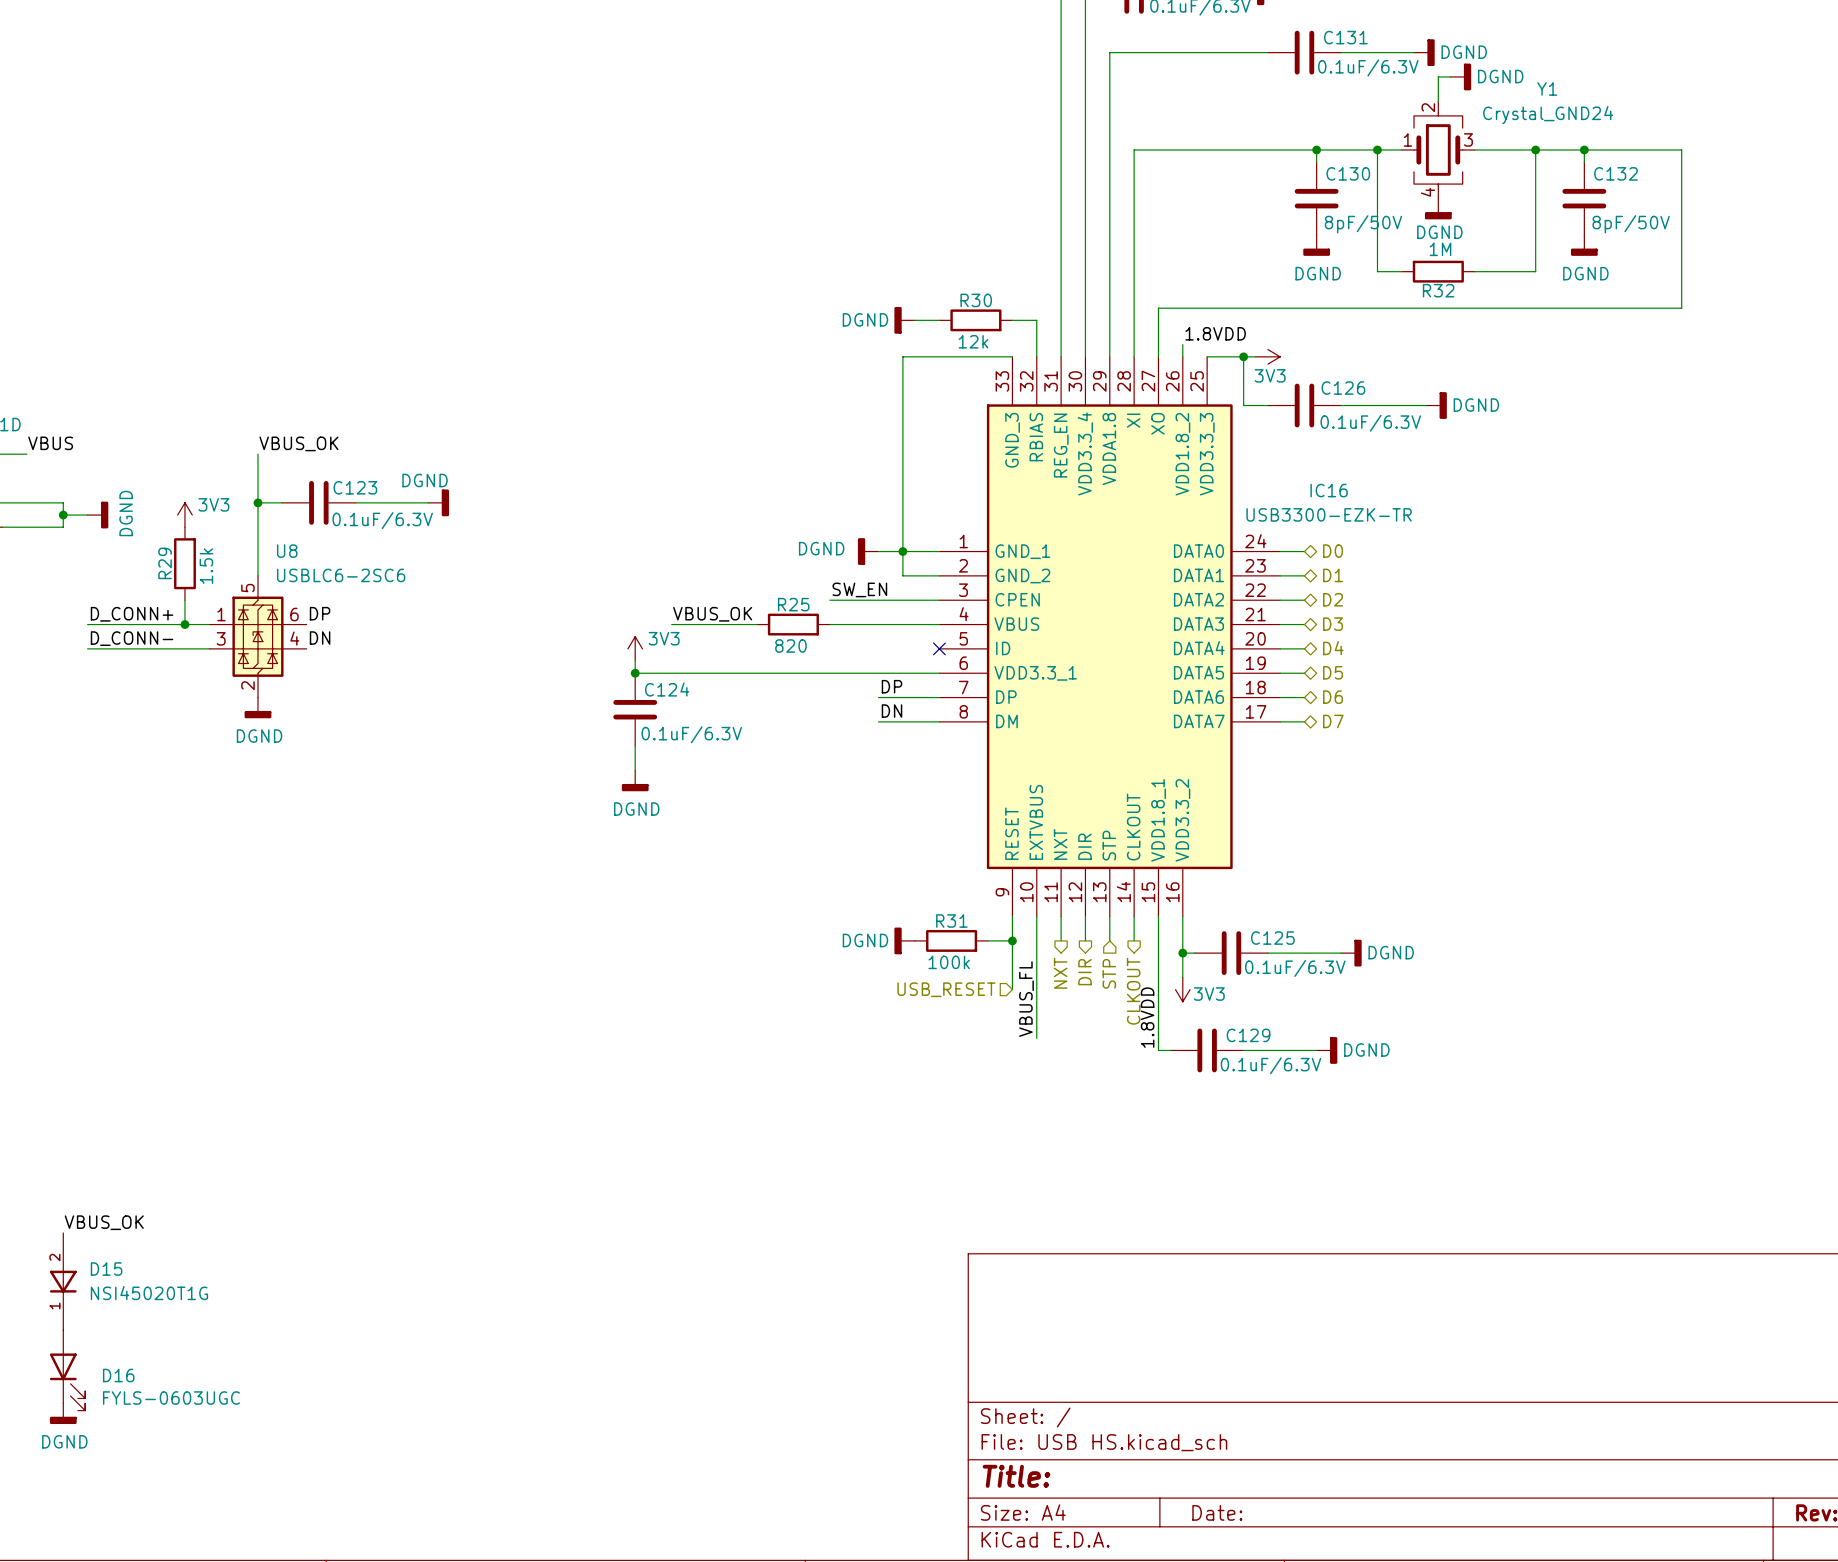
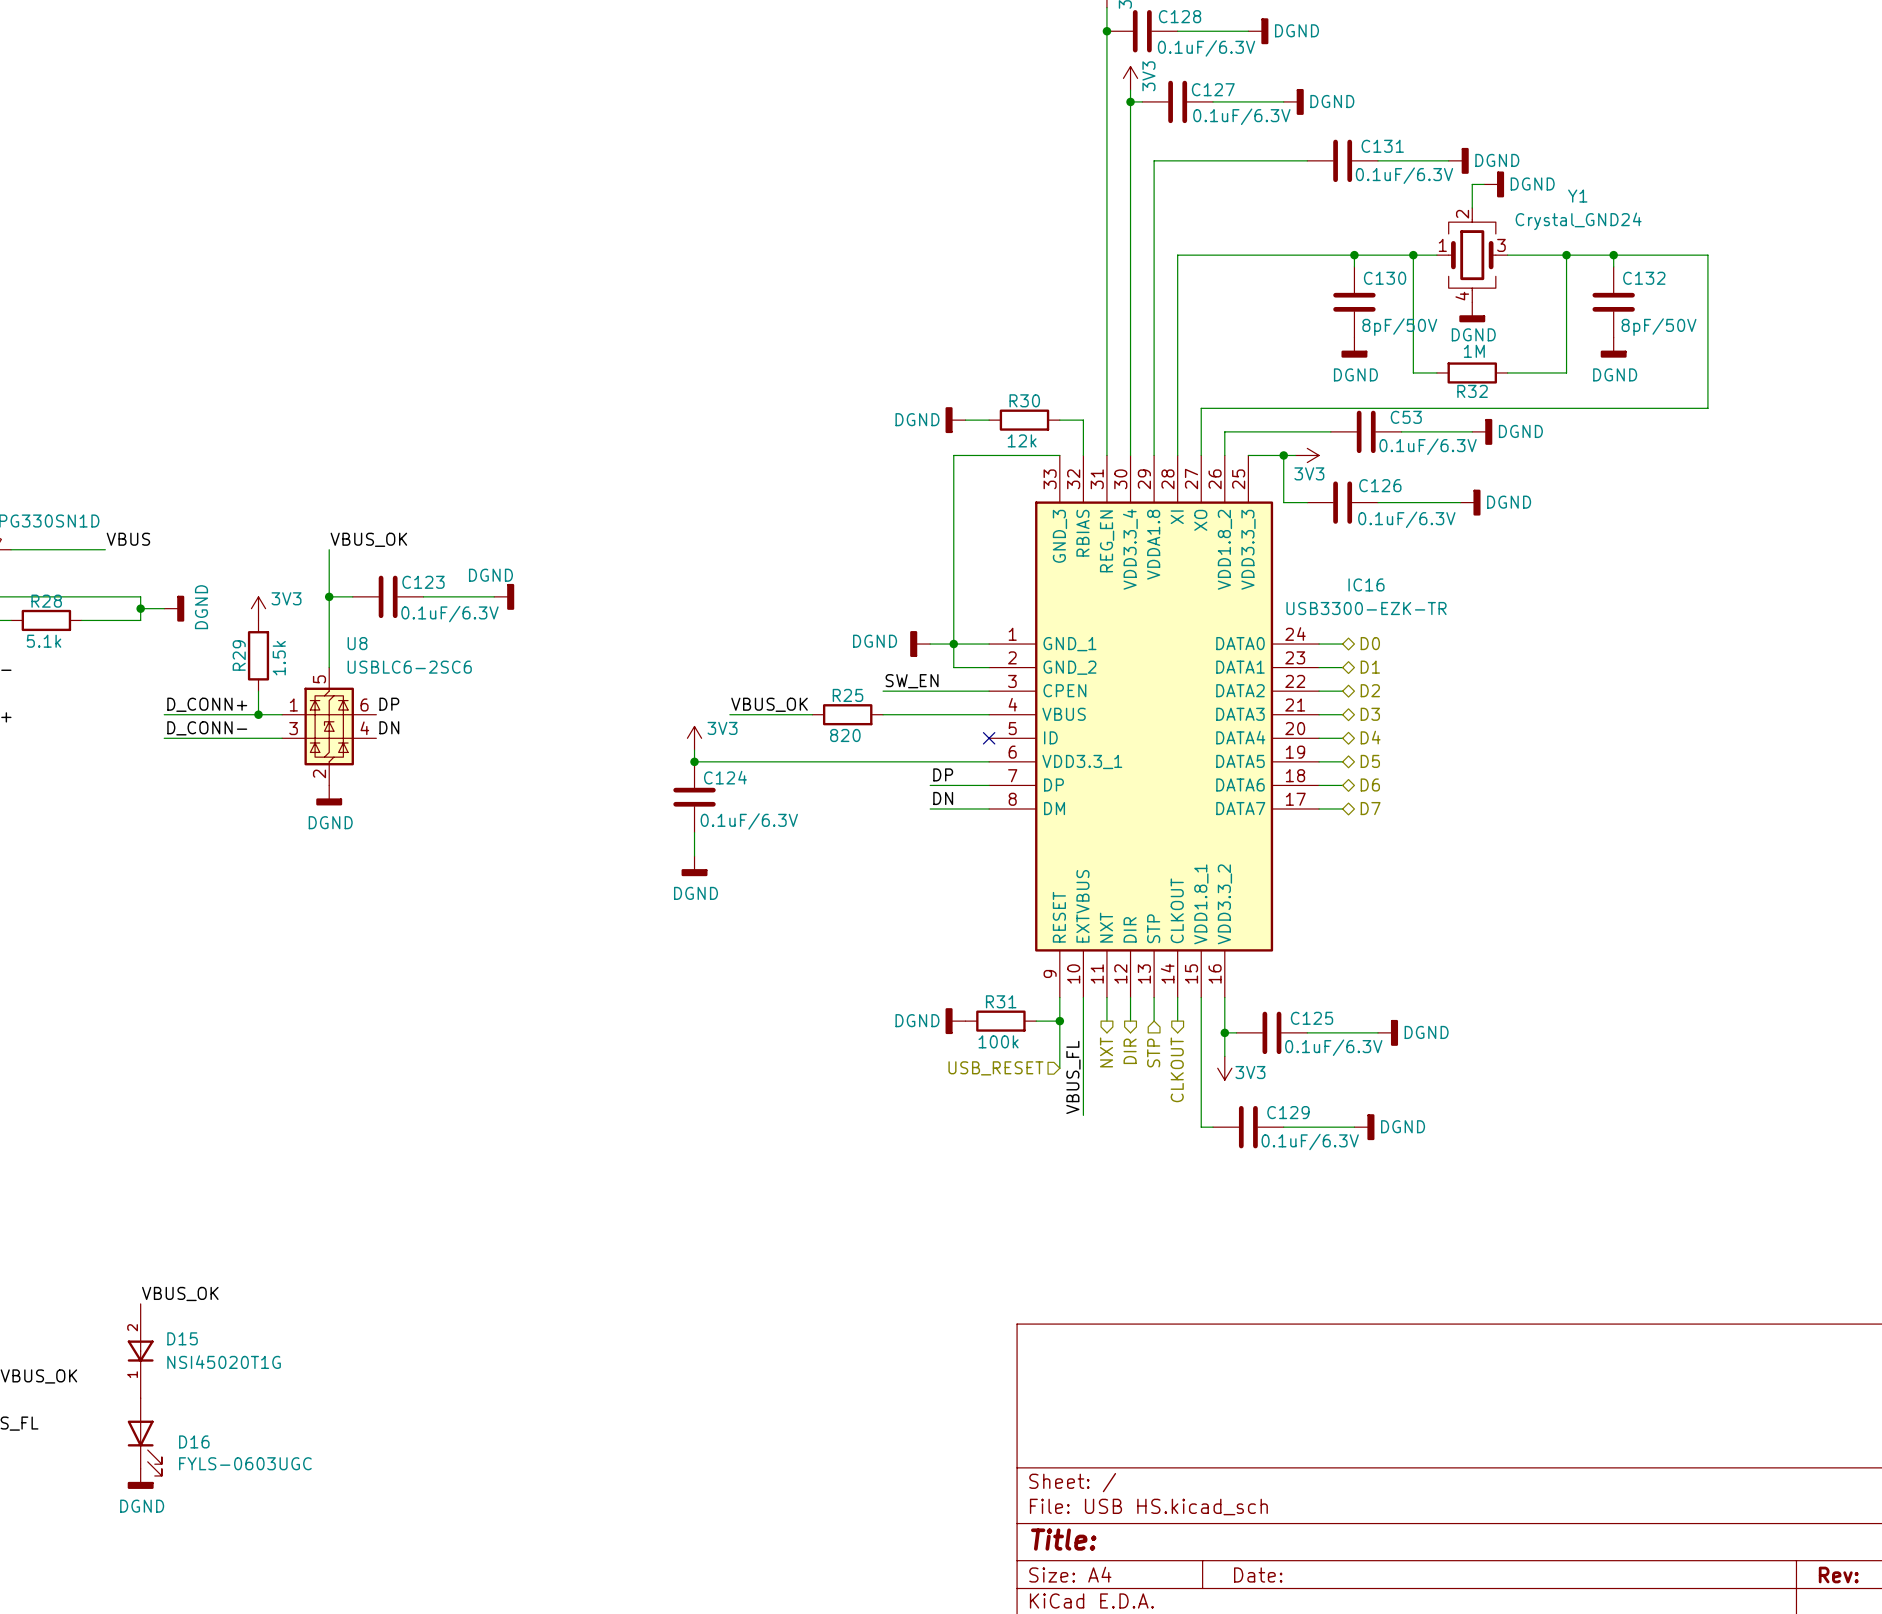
wire: none -> (1330, 431) (1224, 431) (1224, 443)
C53: none -> 0.1uF/6.3V (1366, 431)
wire: none -> (1401, 431) (1472, 431)
power symbol: none -> DGND (1482, 431)
label: 1.8VDD (1215, 333) -> none
label: 1.8VDD (1147, 1017) -> none

